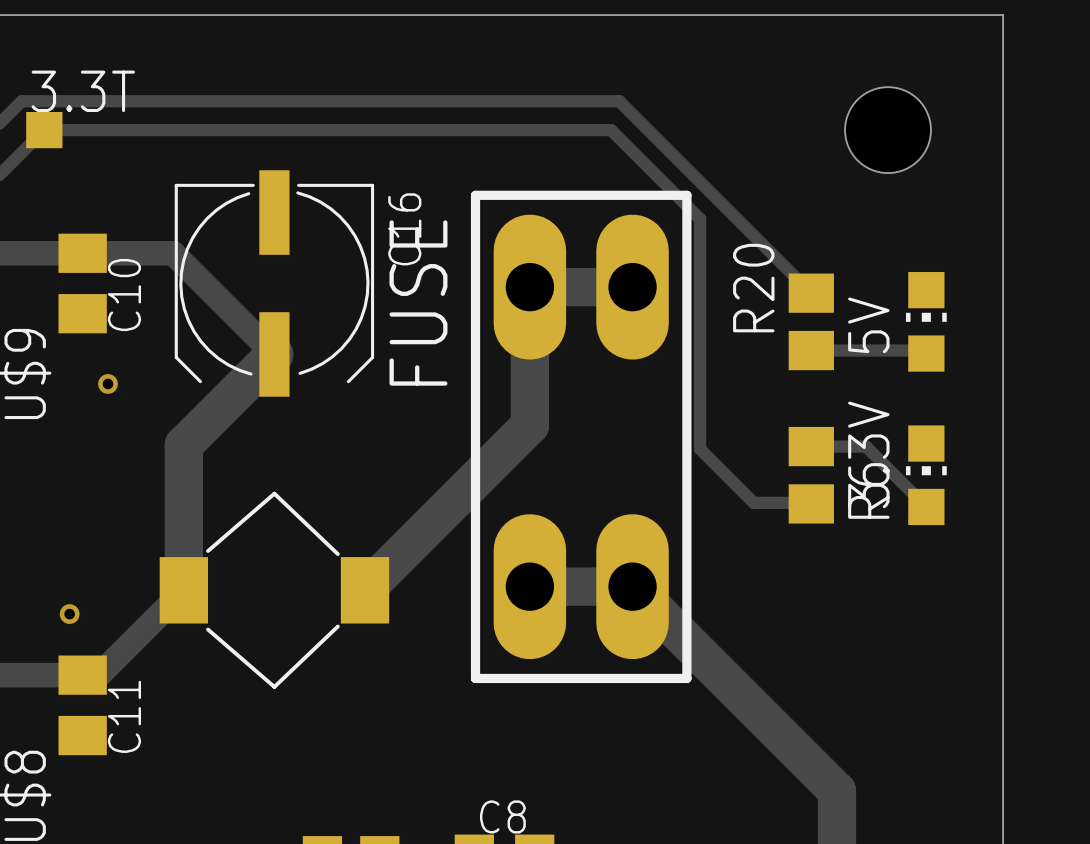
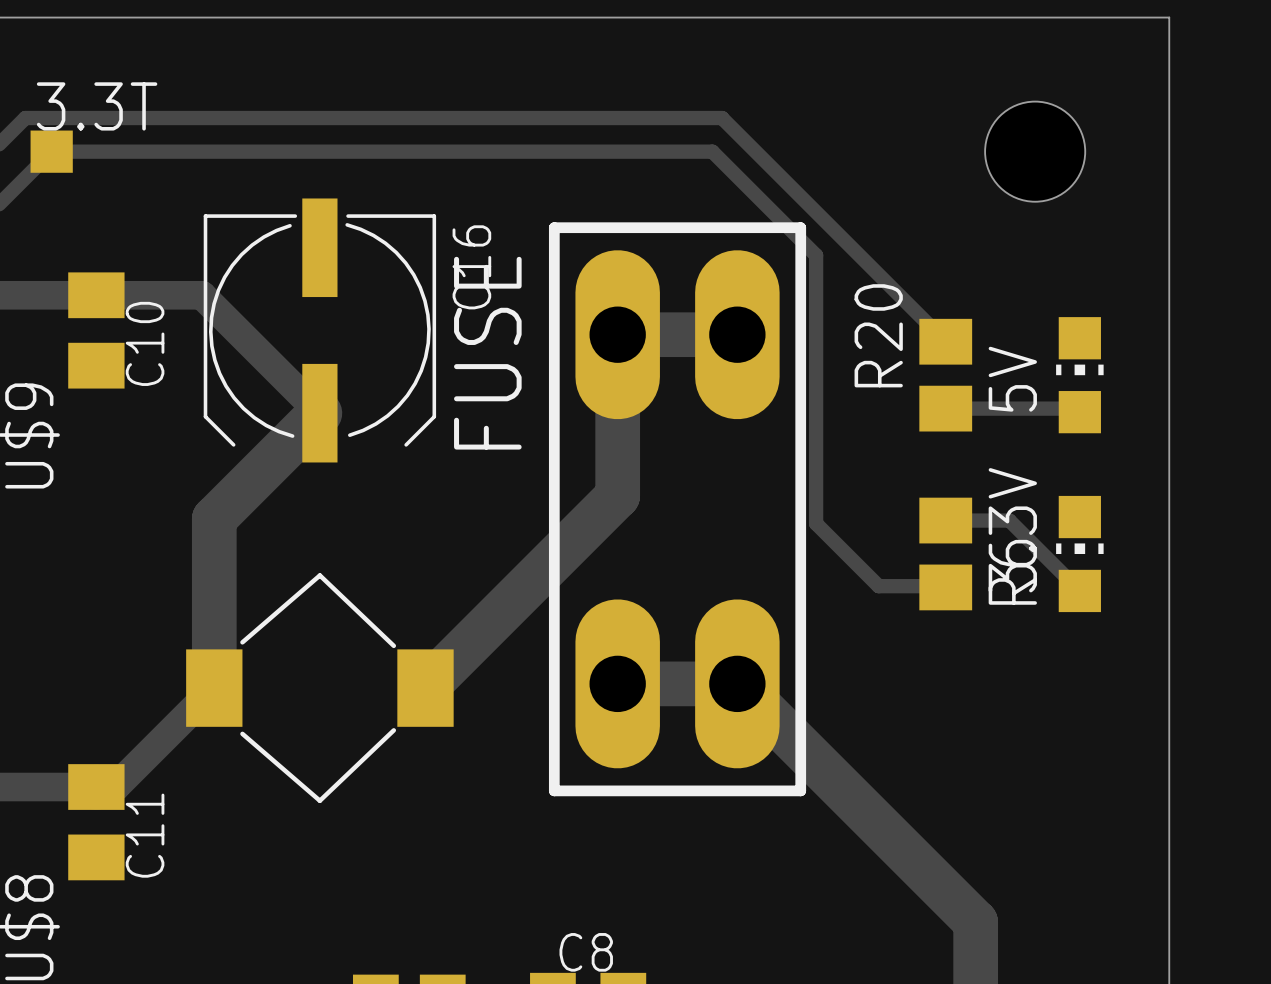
via: (107, 383) -> none
via: (69, 614) -> none

